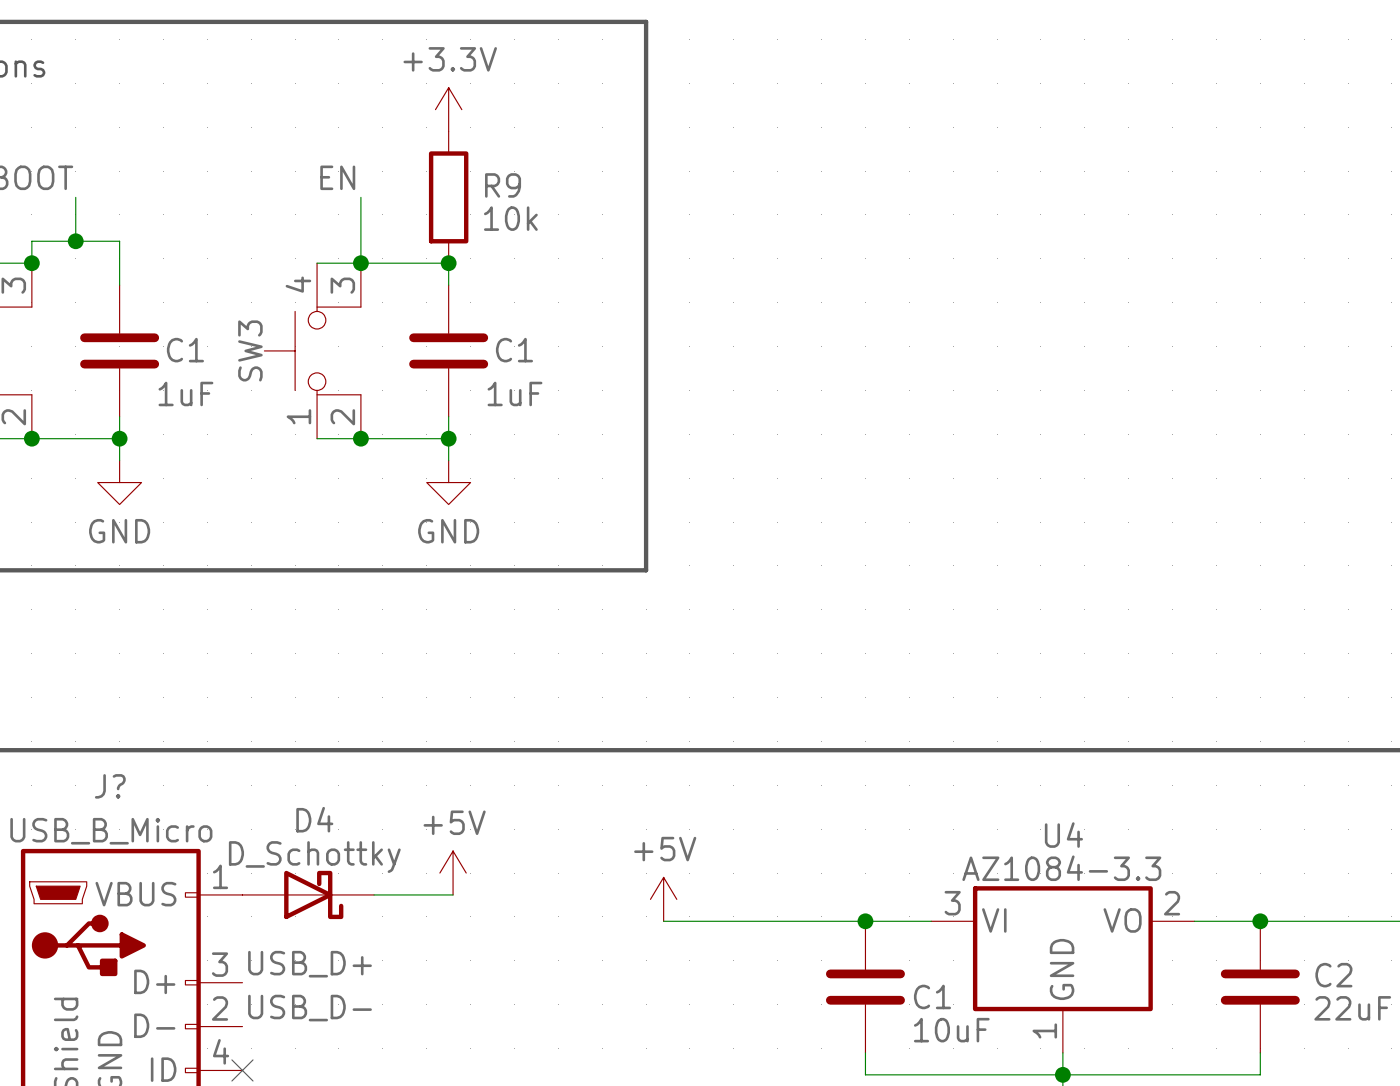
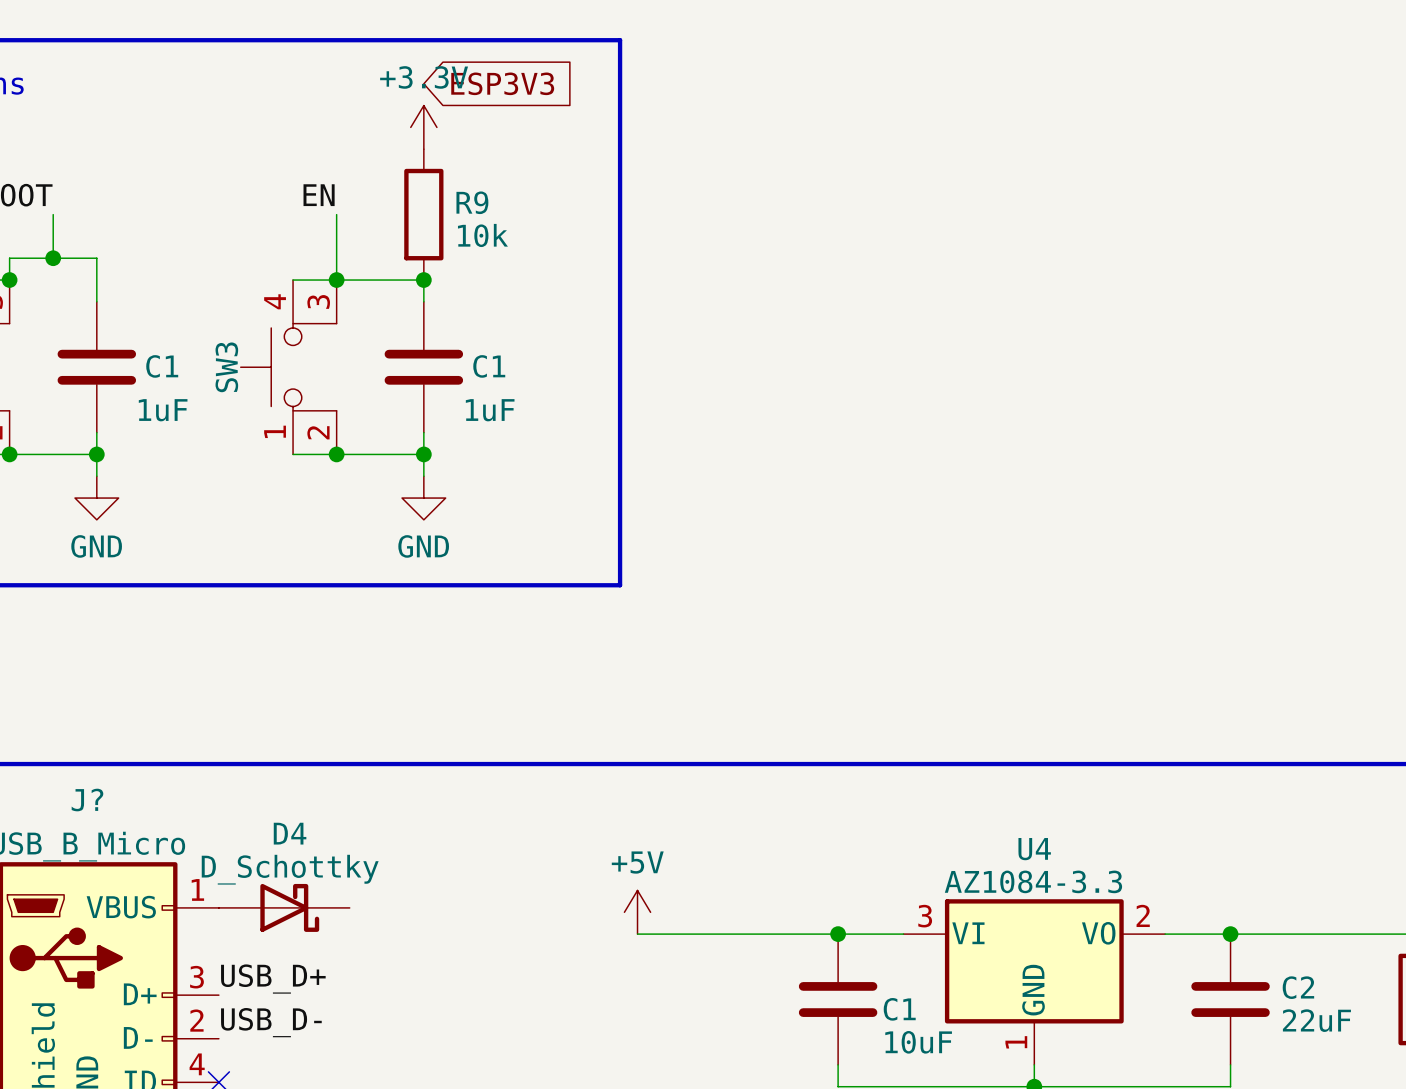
global label: none -> ESP3V3 (502, 83)
power symbol: +5V (453, 873) -> none
wire: (374, 894) (453, 894) -> none

